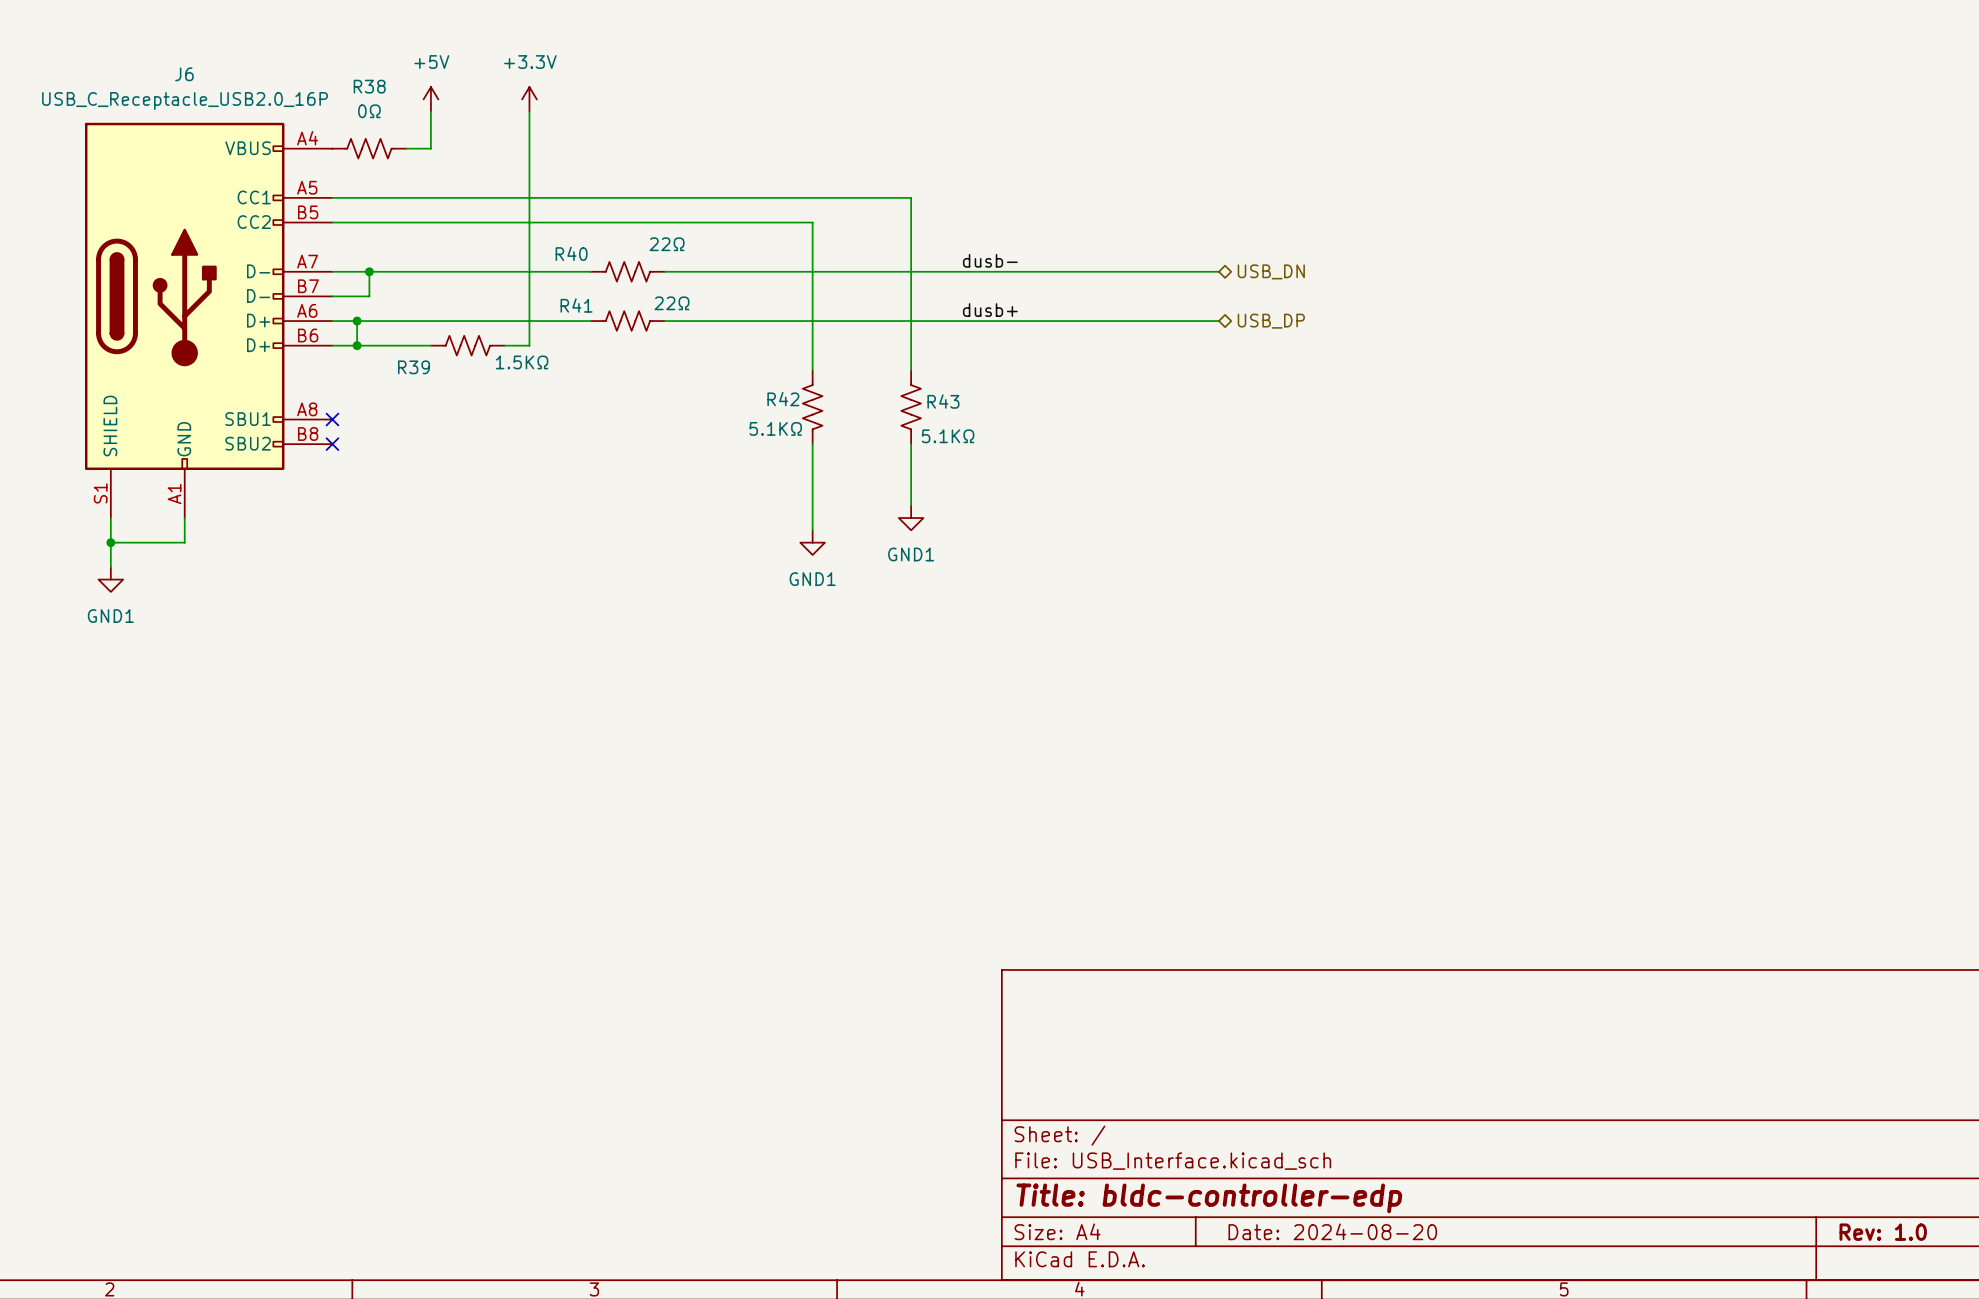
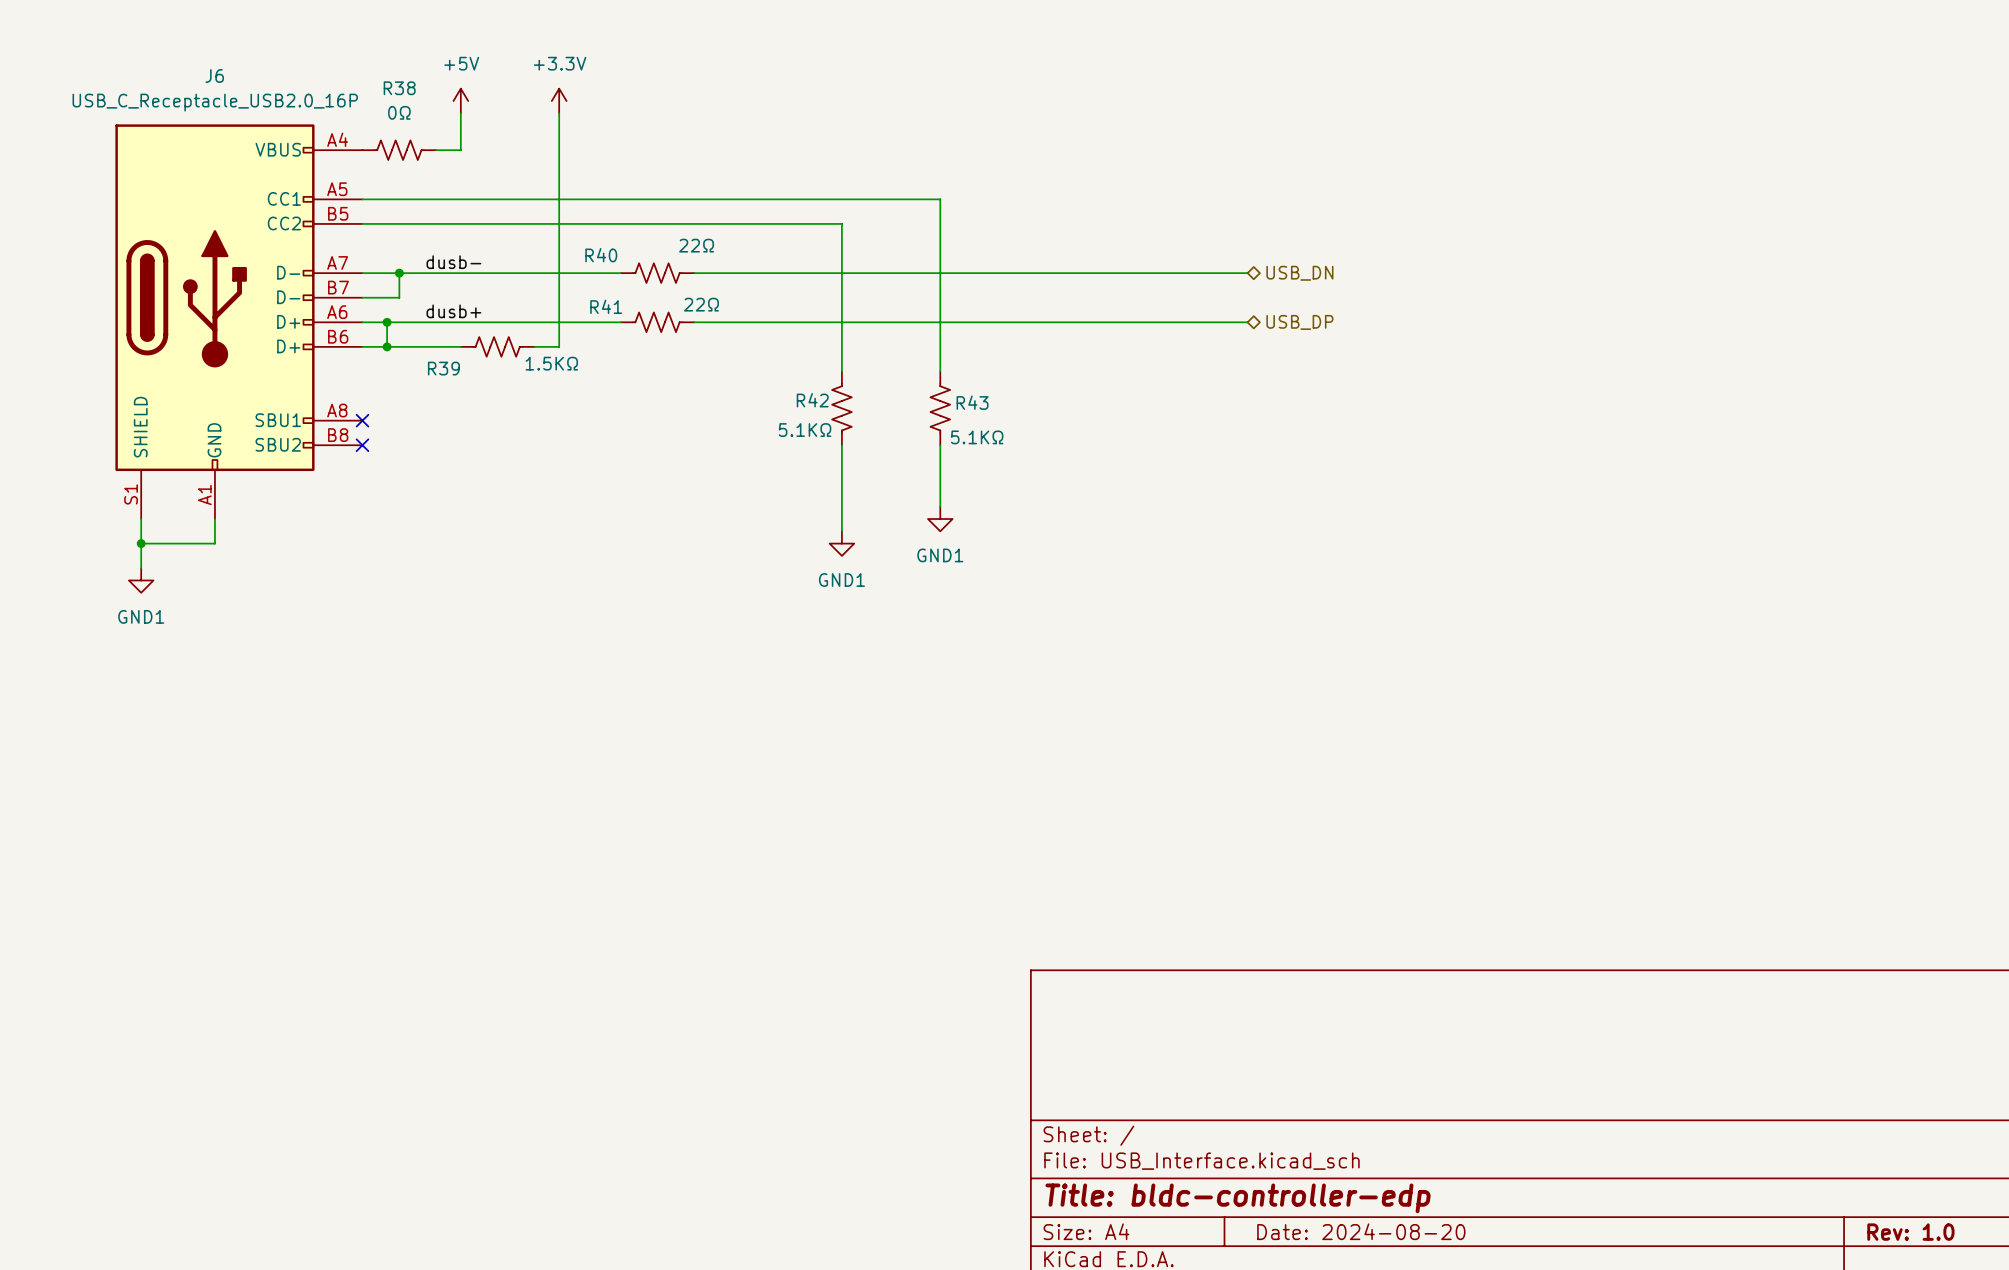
label: none -> dusb- (453, 262)
label: dusb- (990, 260) -> none
label: none -> dusb+ (453, 311)
label: dusb+ (990, 310) -> none

